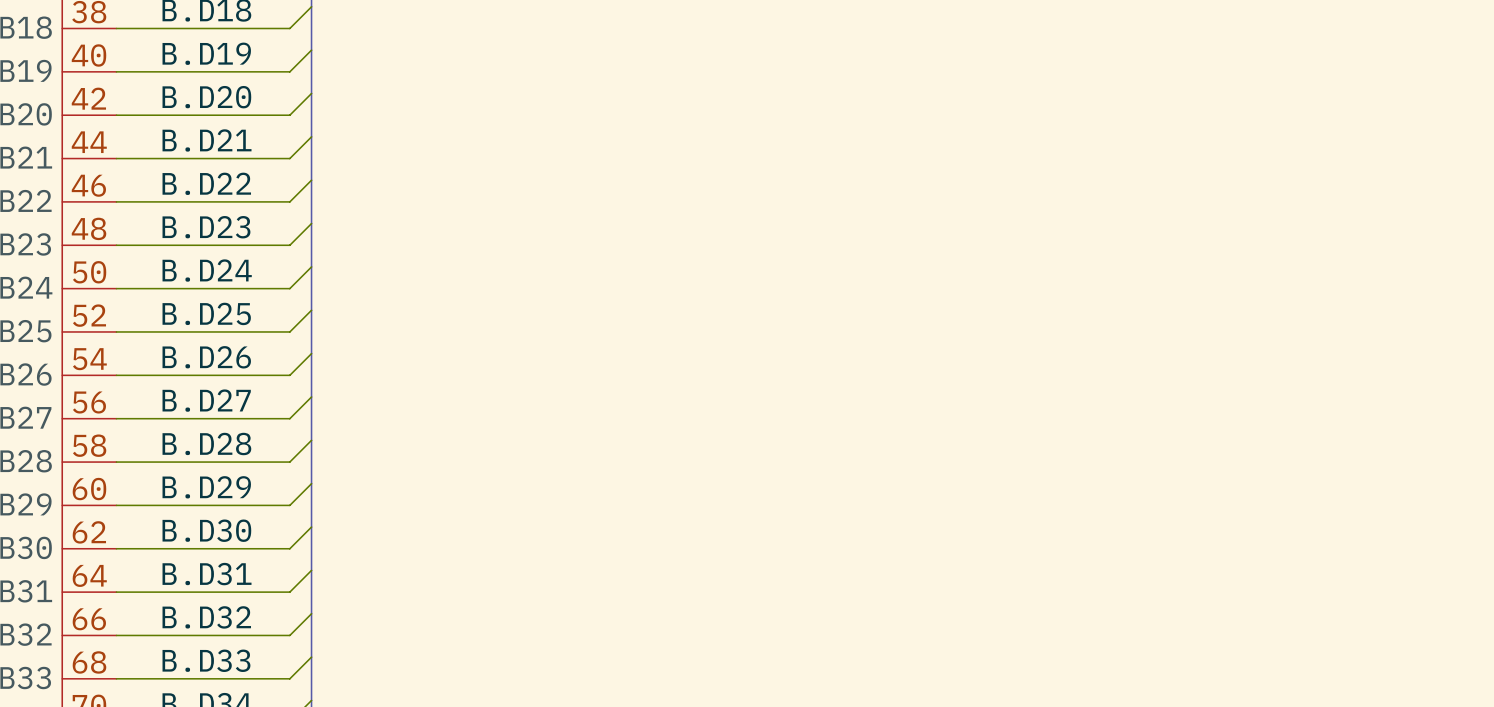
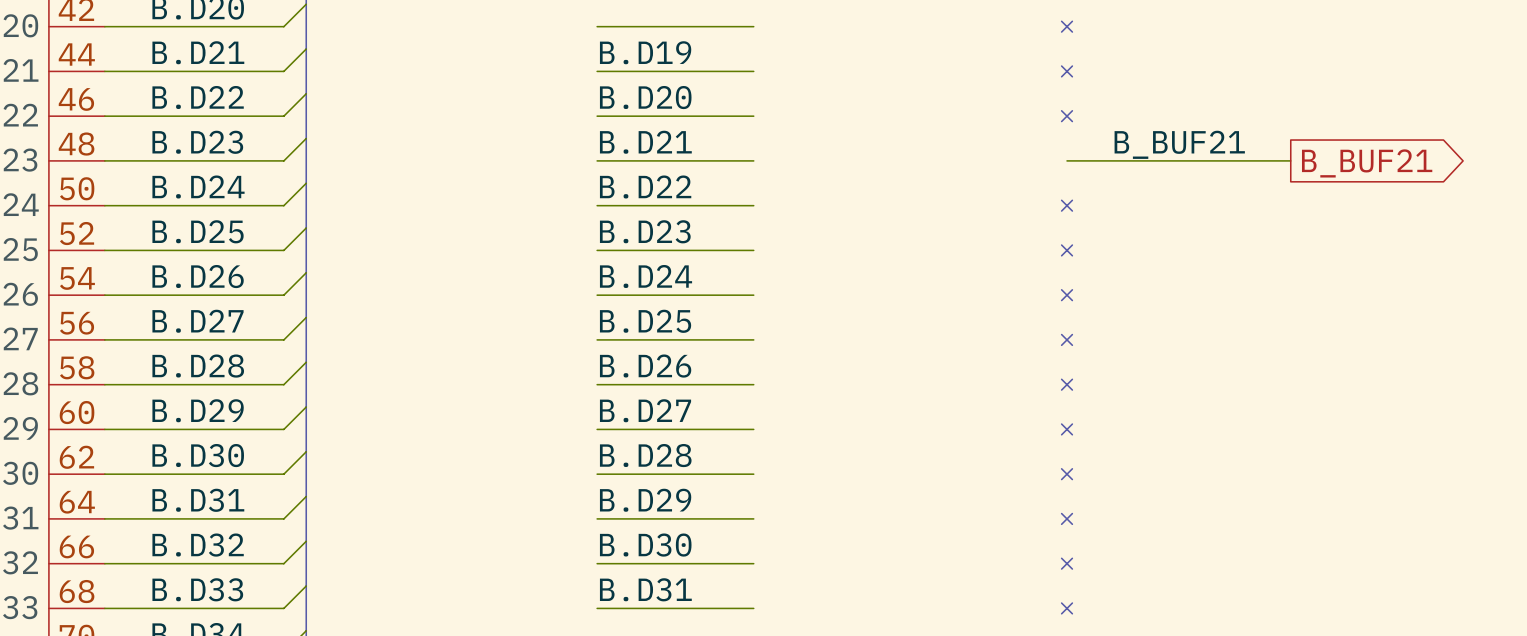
wire: none -> (597, 26) (753, 26)
no-connect mark: none -> (1067, 26)
label: none -> B.D19 (645, 52)
wire: none -> (597, 71) (753, 71)
no-connect mark: none -> (1067, 71)
label: none -> B.D20 (645, 97)
wire: none -> (597, 116) (753, 116)
no-connect mark: none -> (1067, 116)
label: none -> B.D21 (645, 142)
label: none -> B_BUF21 (1179, 144)
wire: none -> (597, 160) (753, 160)
wire: none -> (1067, 160) (1290, 160)
global label: none -> B_BUF21 (1367, 163)
label: none -> B.D22 (645, 186)
wire: none -> (597, 205) (753, 205)
no-connect mark: none -> (1067, 205)
label: none -> B.D23 (645, 231)
wire: none -> (597, 250) (753, 250)
no-connect mark: none -> (1067, 250)
label: none -> B.D24 (646, 276)
wire: none -> (597, 295) (753, 295)
no-connect mark: none -> (1067, 295)
label: none -> B.D25 (645, 321)
wire: none -> (597, 339) (753, 339)
no-connect mark: none -> (1067, 339)
label: none -> B.D26 (645, 366)
wire: none -> (597, 384) (753, 384)
no-connect mark: none -> (1067, 384)
label: none -> B.D27 (645, 410)
wire: none -> (597, 429) (753, 429)
no-connect mark: none -> (1067, 429)
label: none -> B.D28 (645, 455)
wire: none -> (597, 474) (753, 474)
no-connect mark: none -> (1067, 474)
label: none -> B.D29 (645, 500)
wire: none -> (597, 518) (753, 518)
no-connect mark: none -> (1067, 518)
label: none -> B.D30 (645, 545)
wire: none -> (597, 563) (753, 563)
no-connect mark: none -> (1067, 563)
label: none -> B.D31 (645, 589)
wire: none -> (597, 608) (753, 608)
no-connect mark: none -> (1067, 608)

